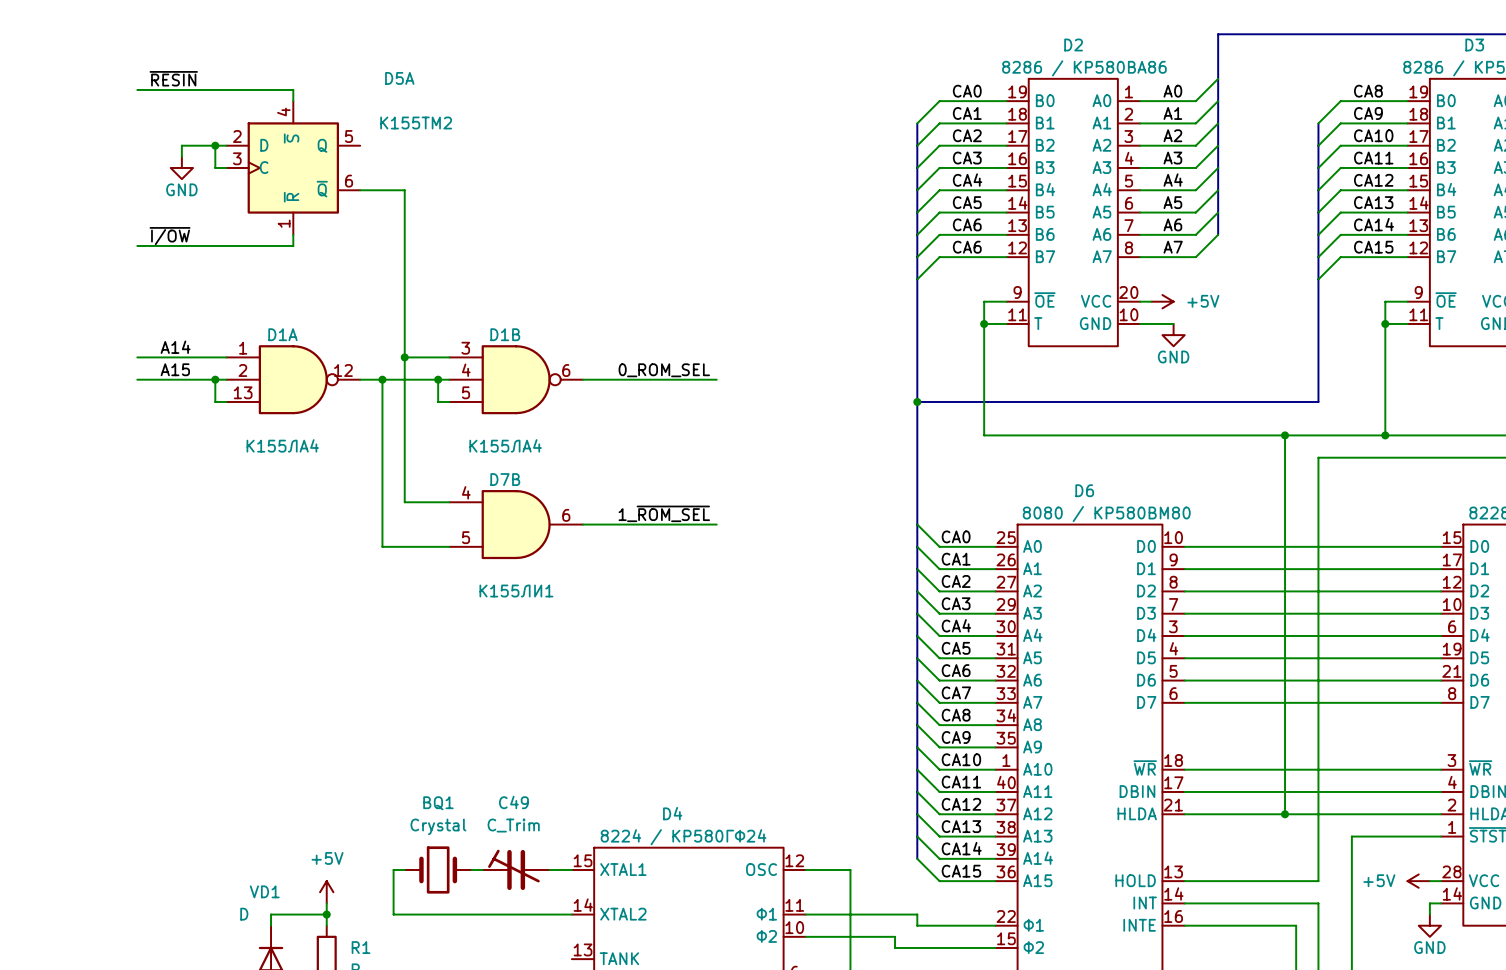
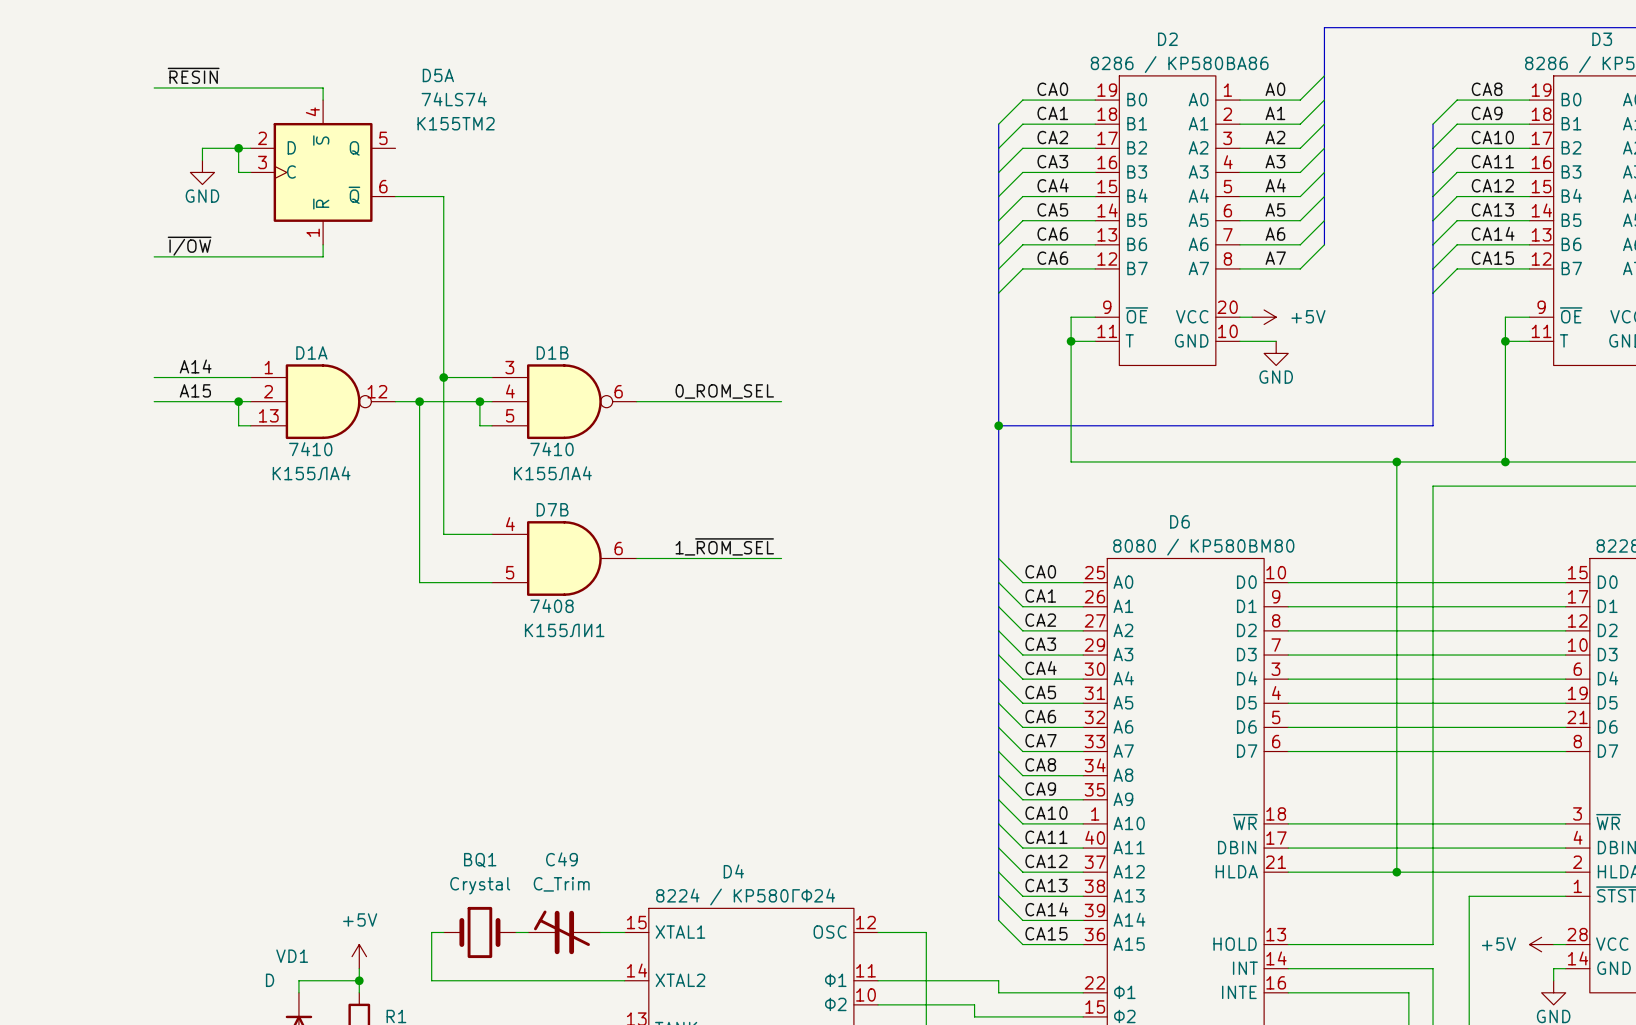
D5A value: none -> 74LS74 (454, 99)
D1A value: none -> 7410 (310, 449)
D1B value: none -> 7410 (552, 449)
D7B value: none -> 7408 (552, 606)

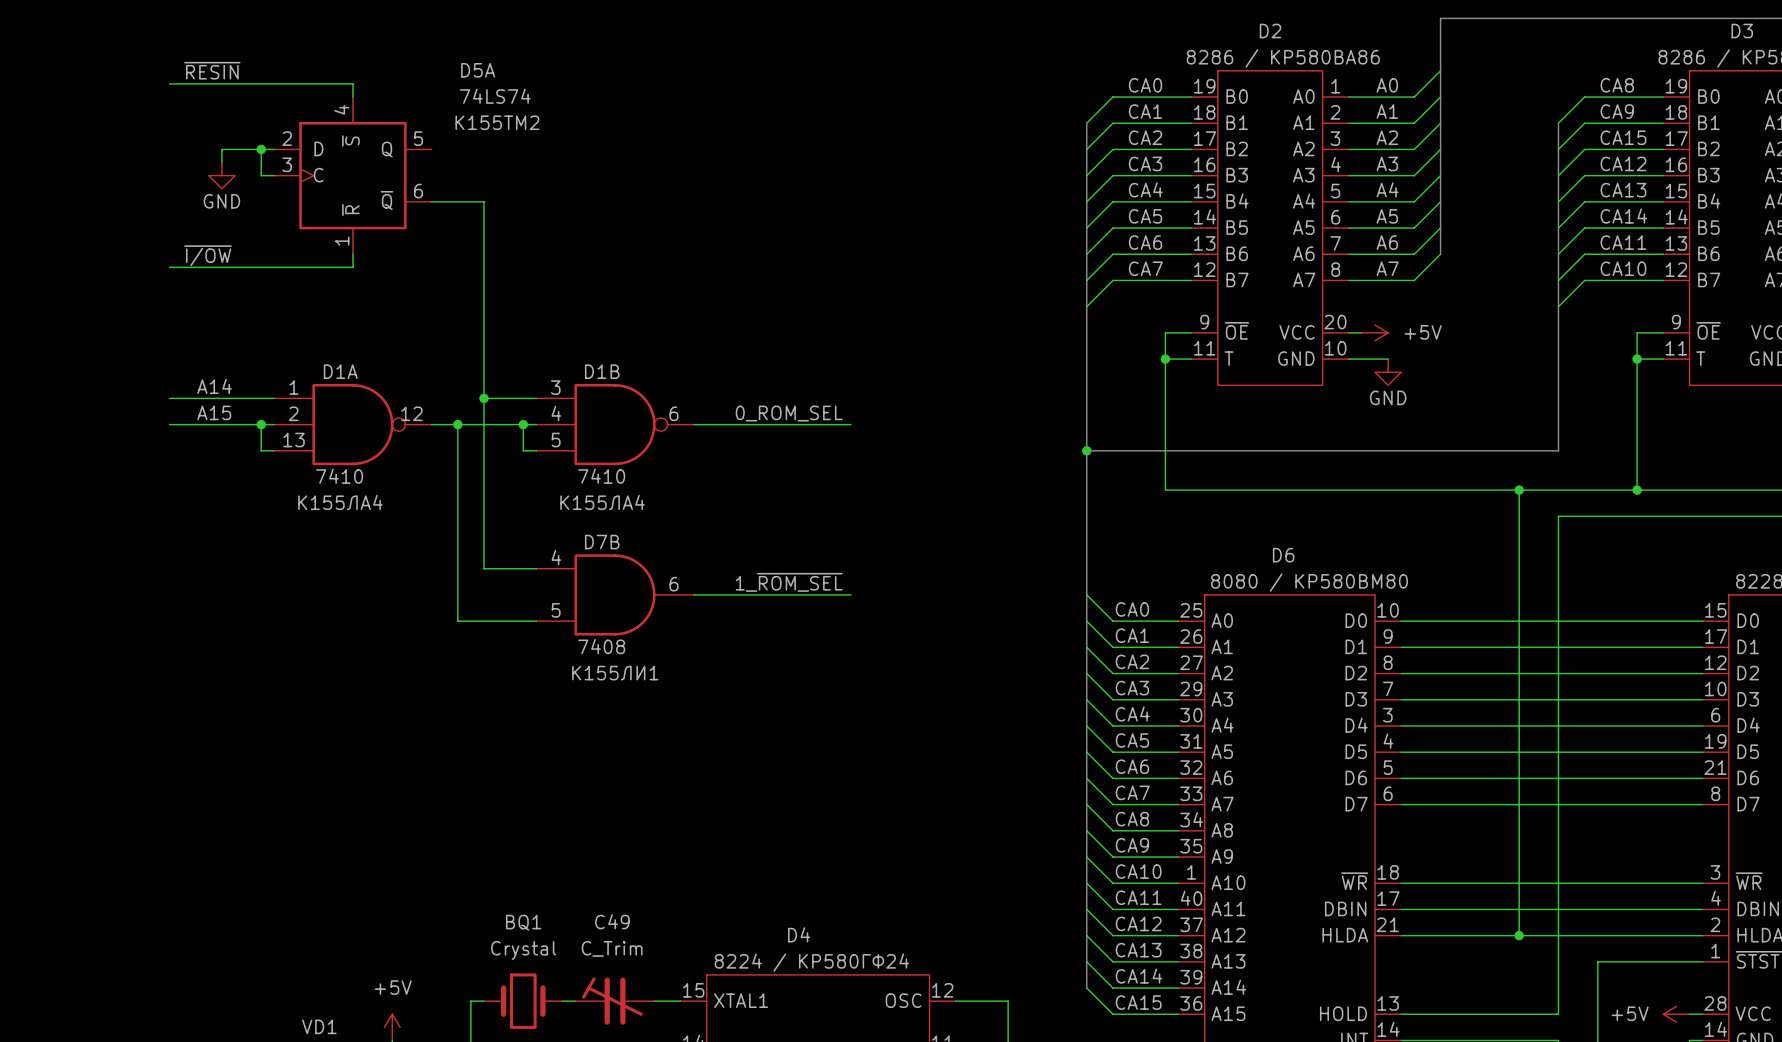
label: CA10 (1492, 137) -> CA15 (1623, 137)
label: CA11 (1492, 161) -> CA12 (1623, 163)
label: CA12 (1492, 185) -> CA13 (1623, 190)
label: CA13 (1492, 209) -> CA14 (1623, 216)
label: CA14 (1493, 233) -> CA11 (1623, 242)
label: CA6 (1052, 258) -> CA7 (1145, 268)
label: CA15 (1492, 258) -> CA10 (1623, 268)

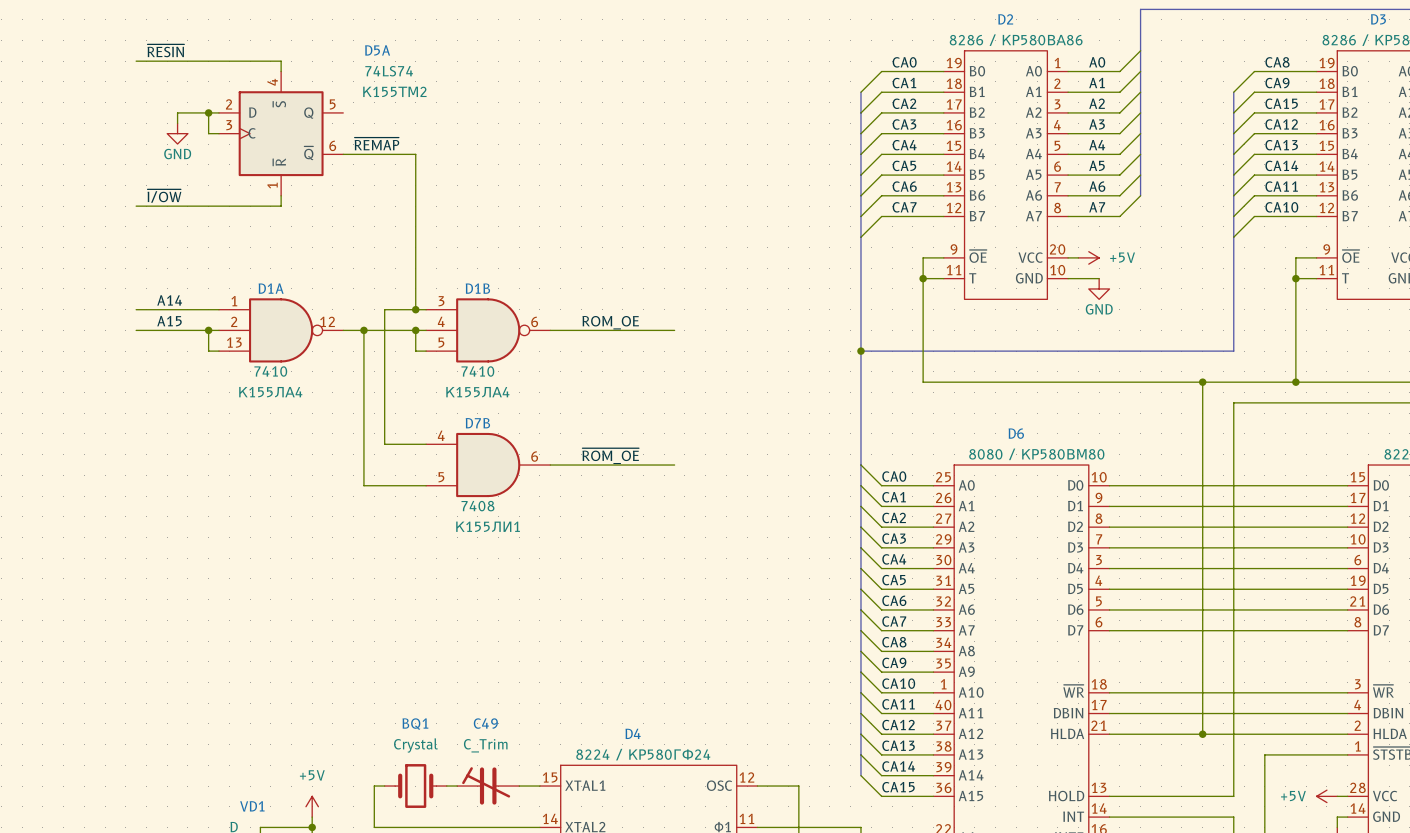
label: none -> ~{REMAP} (376, 143)
wire: (484, 201) (484, 398) -> (384, 154) (415, 154) (415, 309)
junction position: (484, 398) -> (415, 309)
label: 0_ROM_SEL (789, 413) -> ROM_OE (610, 322)
label: 1_~{ROM_SEL} (789, 582) -> ~{ROM_OE} (610, 456)

